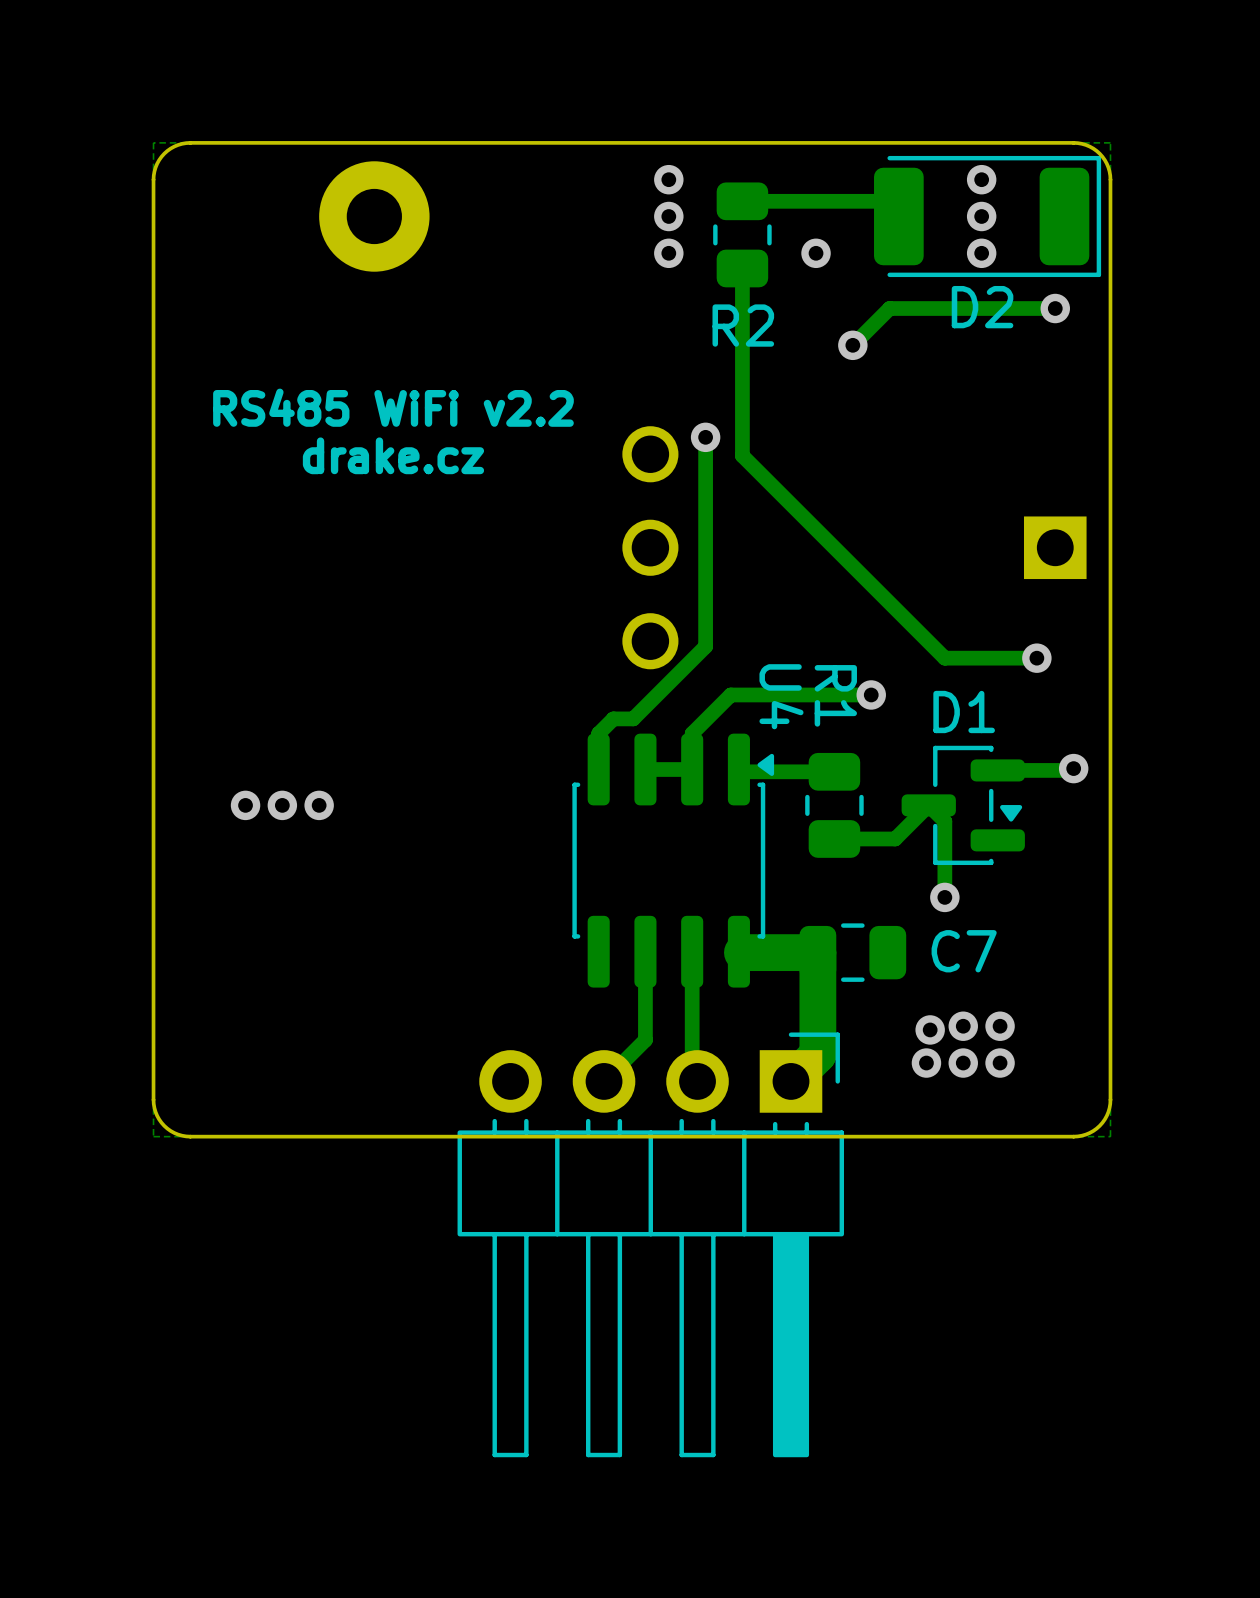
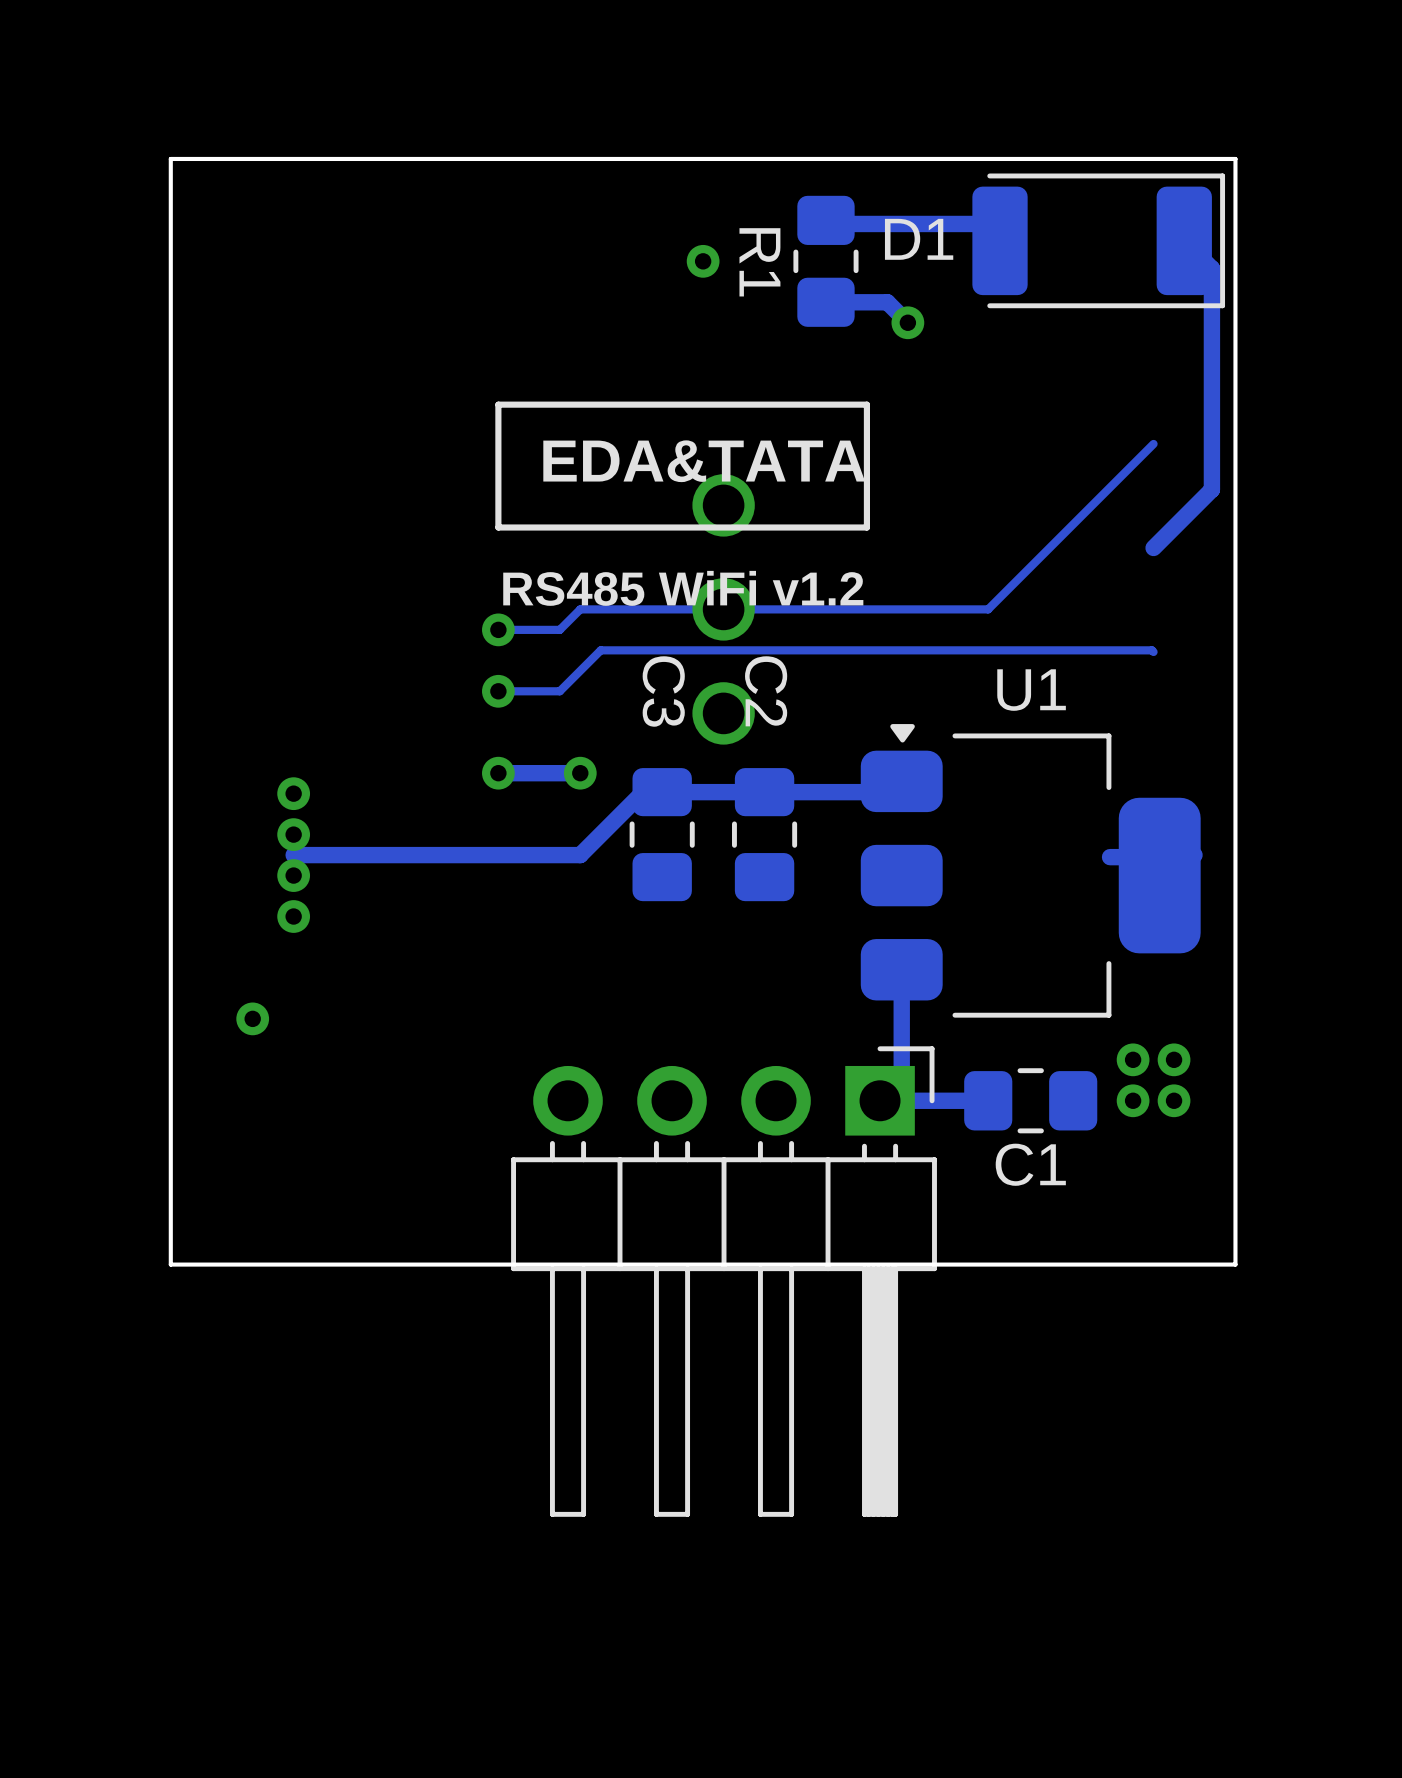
board edge: (190, 142) (178, 144) (164, 153) (155, 167) (153, 179) -> (211, 158) (170, 158) (170, 199)
board edge: (1073, 142) (1089, 146) (1099, 153) (1108, 167) (1110, 179) -> (1194, 158) (1235, 158) (1235, 199)
via: (668, 179) -> none
via: (981, 179) -> none
part: (374, 216) -> none
via: (668, 216) -> none
via: (981, 216) -> none
track: none -> (1184, 240) (1211, 268) (1211, 489) (1153, 547)
via: none -> (703, 261)
R2: (742, 234) -> none
via: (668, 253) -> none
via: (816, 253) -> none
via: (981, 253) -> none
track: (742, 268) (742, 455) (944, 658) (1036, 658) -> none
track: none -> (825, 302) (887, 302) (907, 322)
via: none -> (907, 322)
D2 name: D2 (982, 307) -> D1 (919, 239)
track: (1055, 308) (889, 308) (852, 345) -> none
via: (1055, 308) -> none
via: (852, 345) -> none
line: none -> (866, 404) (498, 404) (498, 527) (866, 527) (866, 404)
track: none -> (1153, 443) (988, 609) (580, 609) (559, 629) (498, 629)
text: RS485 WiFi v2.2 (393, 407) -> none
text: none -> EDA&TATA (704, 461)
track: (705, 437) (705, 646) (633, 718) (613, 718) (598, 733) (598, 769) -> none
via: (705, 437) -> none
text: drake.cz (393, 455) -> none
text: none -> RS485 WiFi v1.2 (683, 588)
part: (1055, 547) -> none
via: none -> (498, 629)
track: none -> (1153, 651) (1151, 650) (600, 650) (559, 691) (498, 691)
via: none -> (498, 691)
via: (1036, 658) -> none
via: none -> (498, 773)
track: none -> (580, 773) (498, 773)
via: none -> (580, 773)
track: (871, 694) (730, 694) (692, 733) (692, 769) (645, 769) -> none
via: (871, 694) -> none
R1 name position: R1 (835, 695) -> R1 (759, 262)
track: none -> (901, 781) (890, 792) (643, 792) (580, 855) (293, 855)
via: none -> (293, 793)
via: none -> (293, 834)
C3: none -> (662, 834)
C2: none -> (764, 834)
R1 footprint: [805, 752, 864, 858] -> [793, 195, 859, 327]
via: (1073, 768) -> none
track: (738, 769) (741, 771) (834, 771) -> none
U1: none -> (1030, 870)
via: none -> (293, 875)
via: (245, 805) -> none
via: (282, 805) -> none
via: (319, 805) -> none
D1: (963, 805) -> none
via: none -> (293, 916)
track: (834, 838) (895, 838) (928, 805) (944, 821) (944, 897) -> none
U4: (673, 860) -> none
track: none -> (901, 969) (901, 1079) (880, 1100) (988, 1100)
via: (944, 897) -> none
via: none -> (252, 1018)
track: (645, 951) (645, 1040) (604, 1081) -> none
track: (692, 951) (692, 1076) (697, 1081) -> none
track: (742, 952) (817, 952) (817, 1054) (791, 1081) -> none
C7: (852, 952) -> none
via: none -> (1133, 1059)
via: none -> (1174, 1059)
C1: none -> (1030, 1100)
via: none -> (1133, 1100)
via: none -> (1174, 1100)
via: (963, 1026) -> none
via: (1000, 1026) -> none
via: (930, 1029) -> none
via: (926, 1063) -> none
via: (963, 1063) -> none
via: (1000, 1063) -> none
board edge: (153, 1099) (155, 1112) (164, 1125) (178, 1134) (190, 1136) -> (170, 1223) (170, 1264) (211, 1264)
board edge: (1110, 1099) (1106, 1115) (1099, 1125) (1085, 1134) (1073, 1136) -> (1235, 1223) (1235, 1264) (1194, 1264)
part: none -> (724, 1281)
part: (650, 1244) -> none

